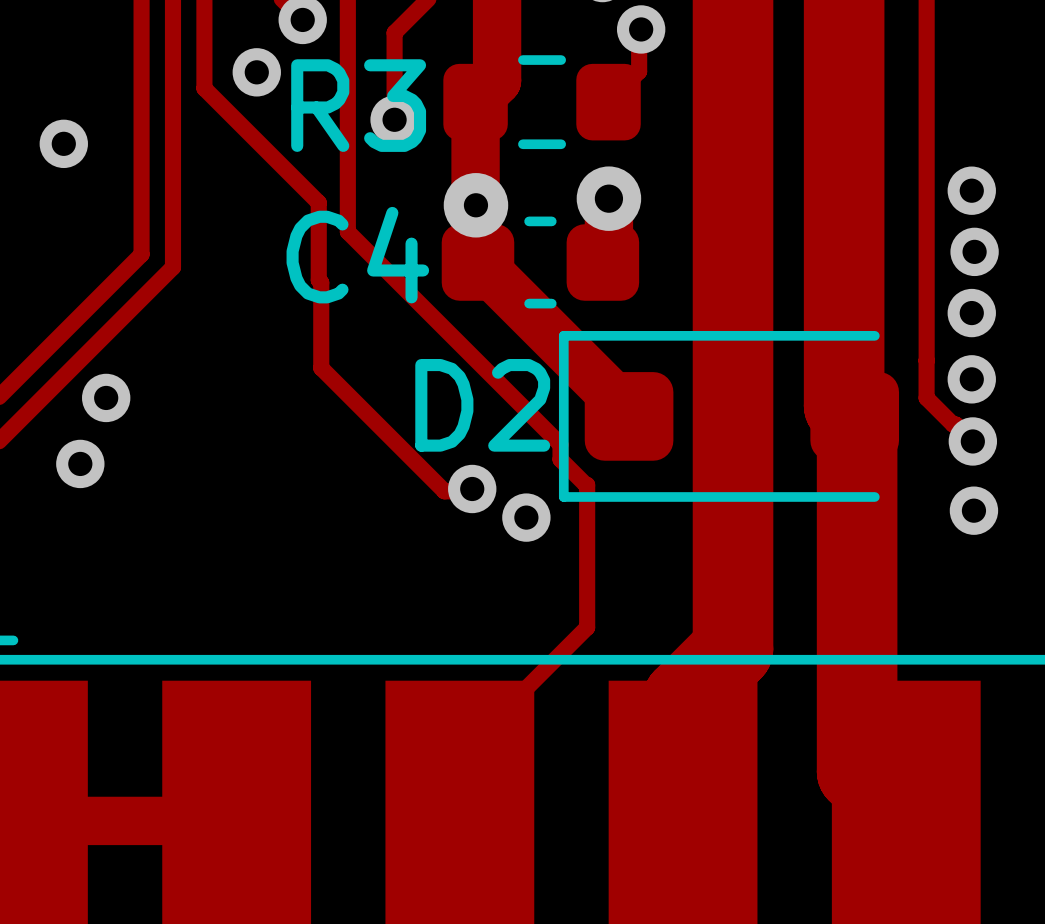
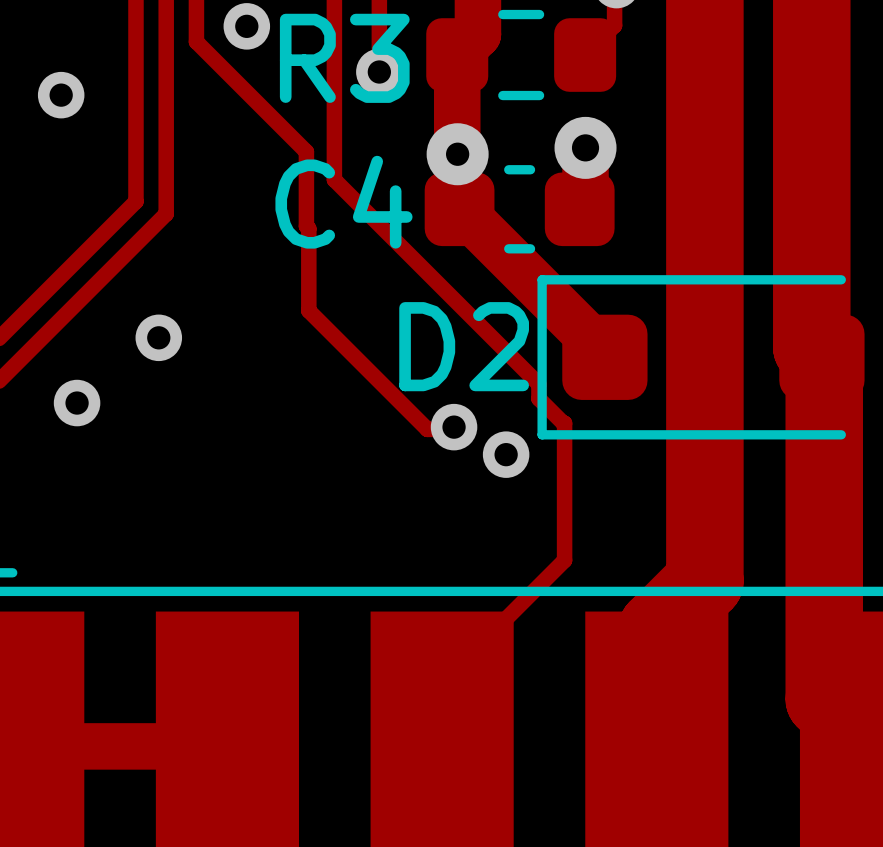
via position: (106, 397) -> (158, 337)

